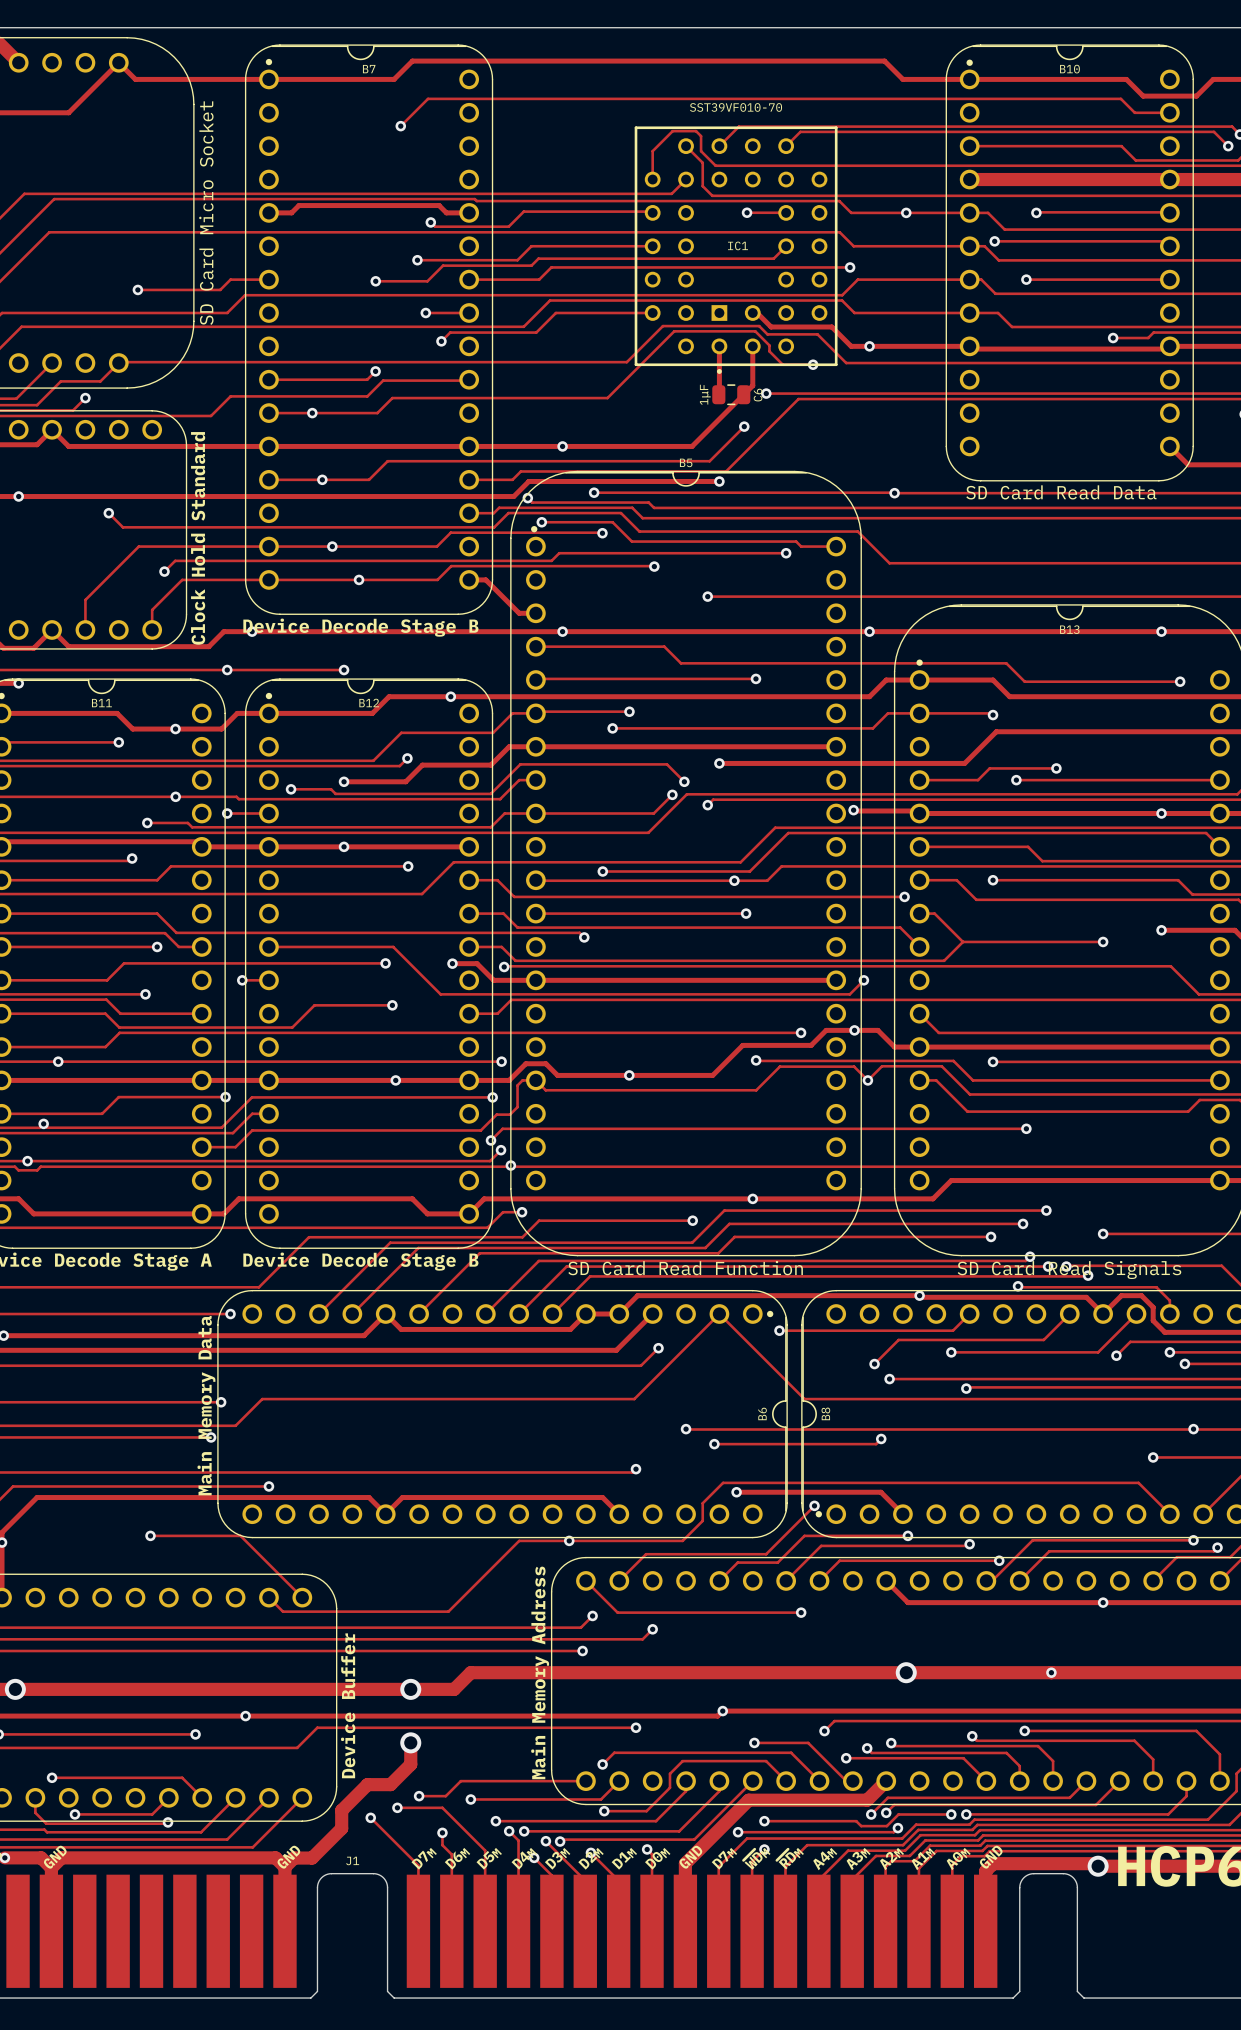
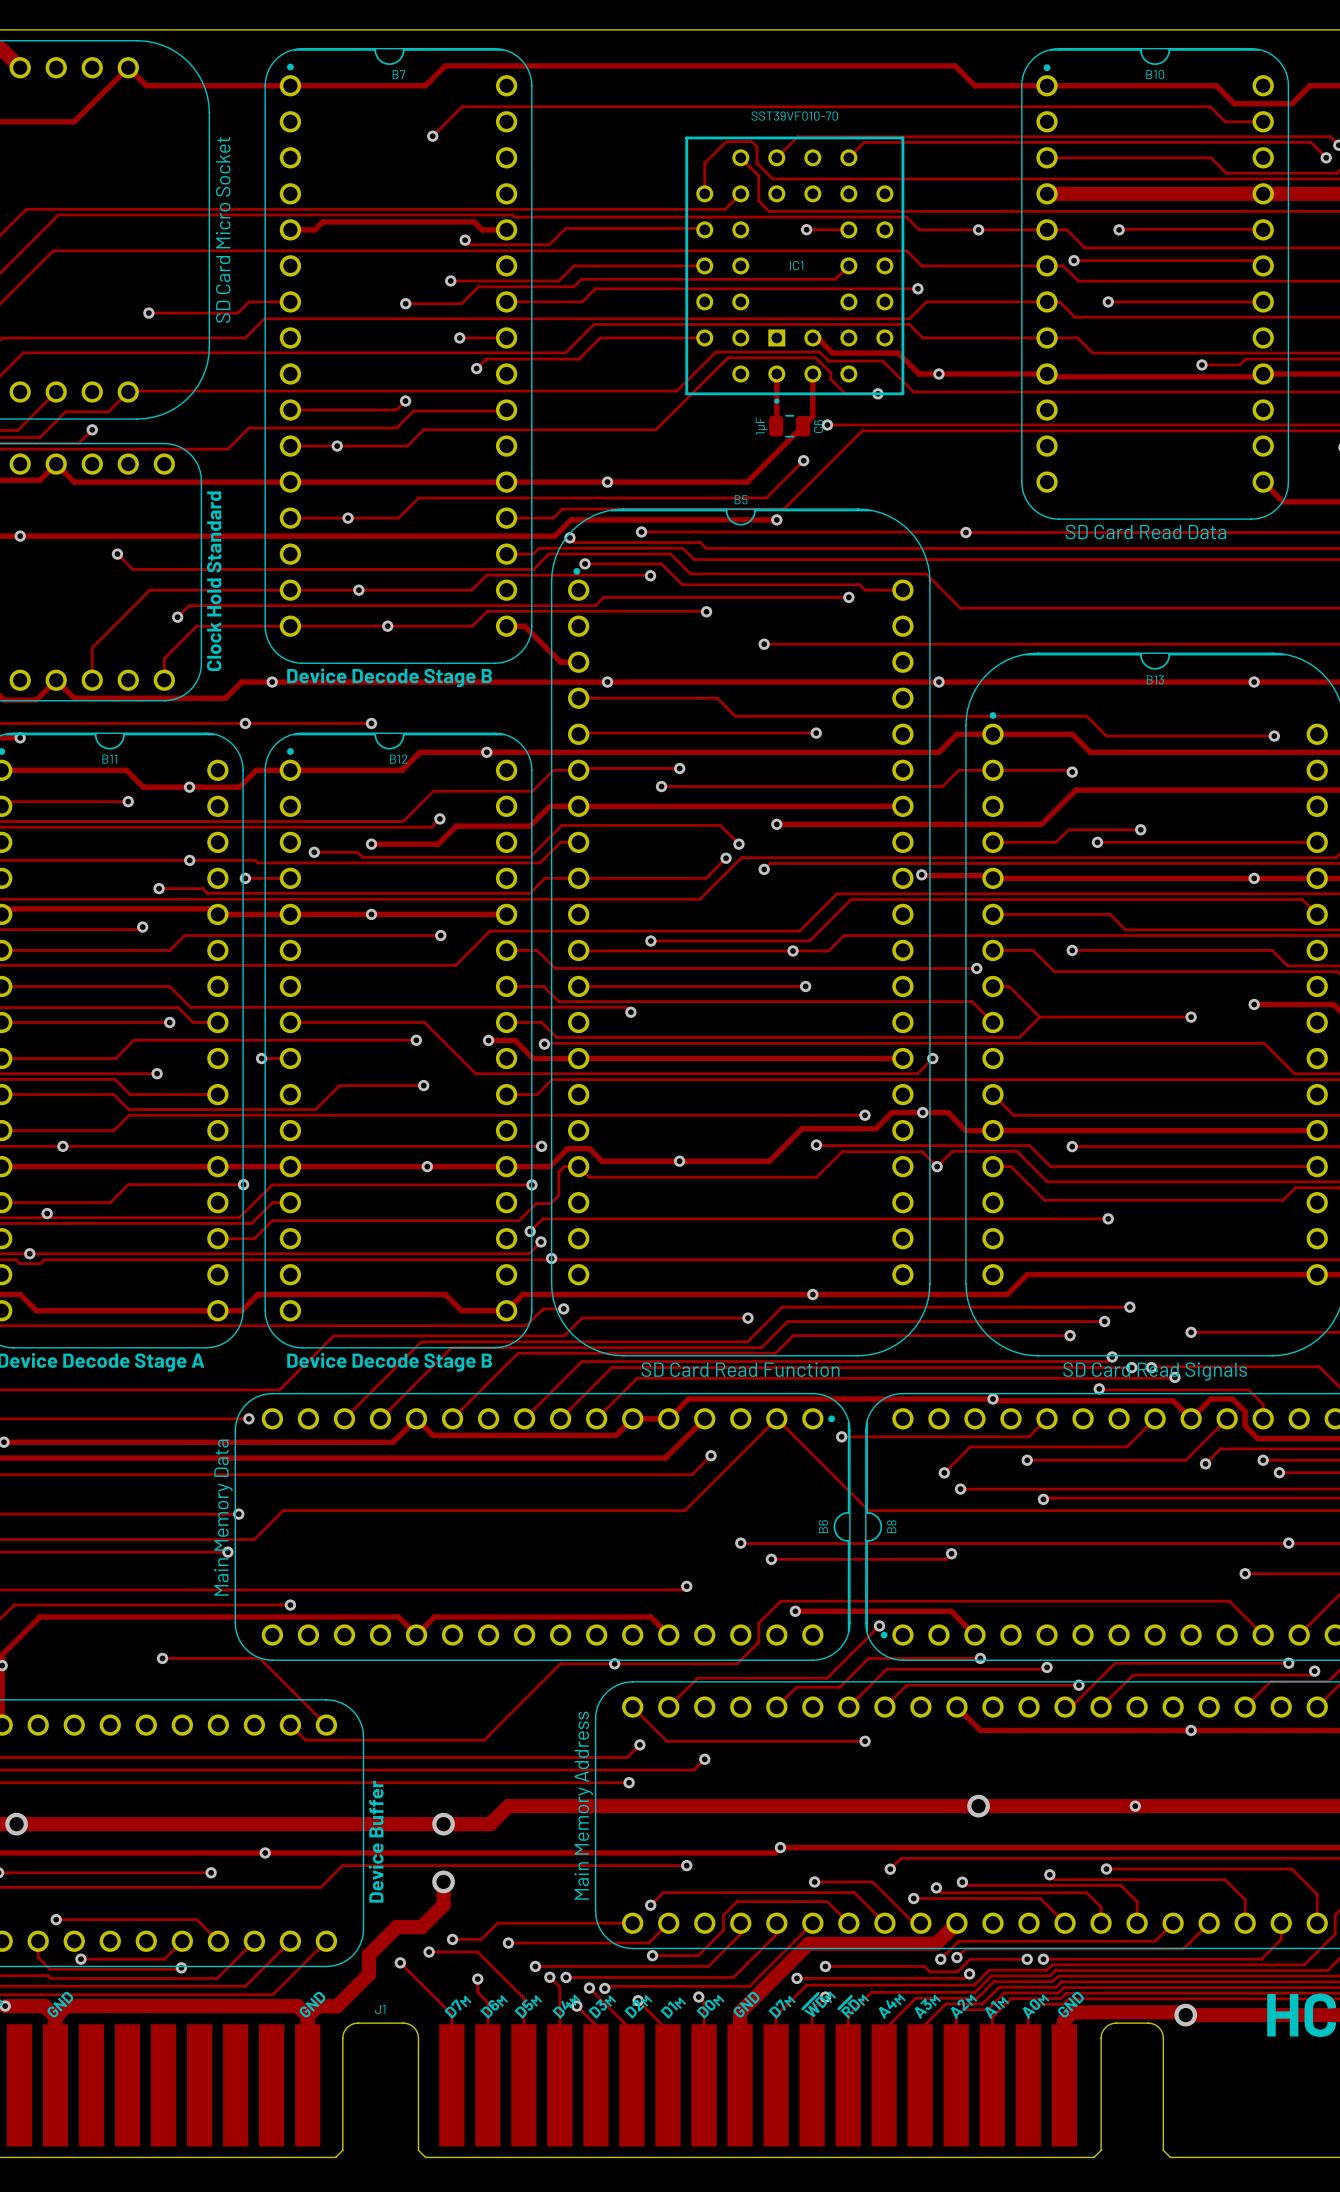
B6 footprint: [217, 1289, 788, 1539] -> [234, 1392, 851, 1661]
B6 text: none -> Main Memory Data (223, 1517)
part text: Main Memory Address (540, 1672) -> none
part text: none -> Main Memory Address (583, 1805)

